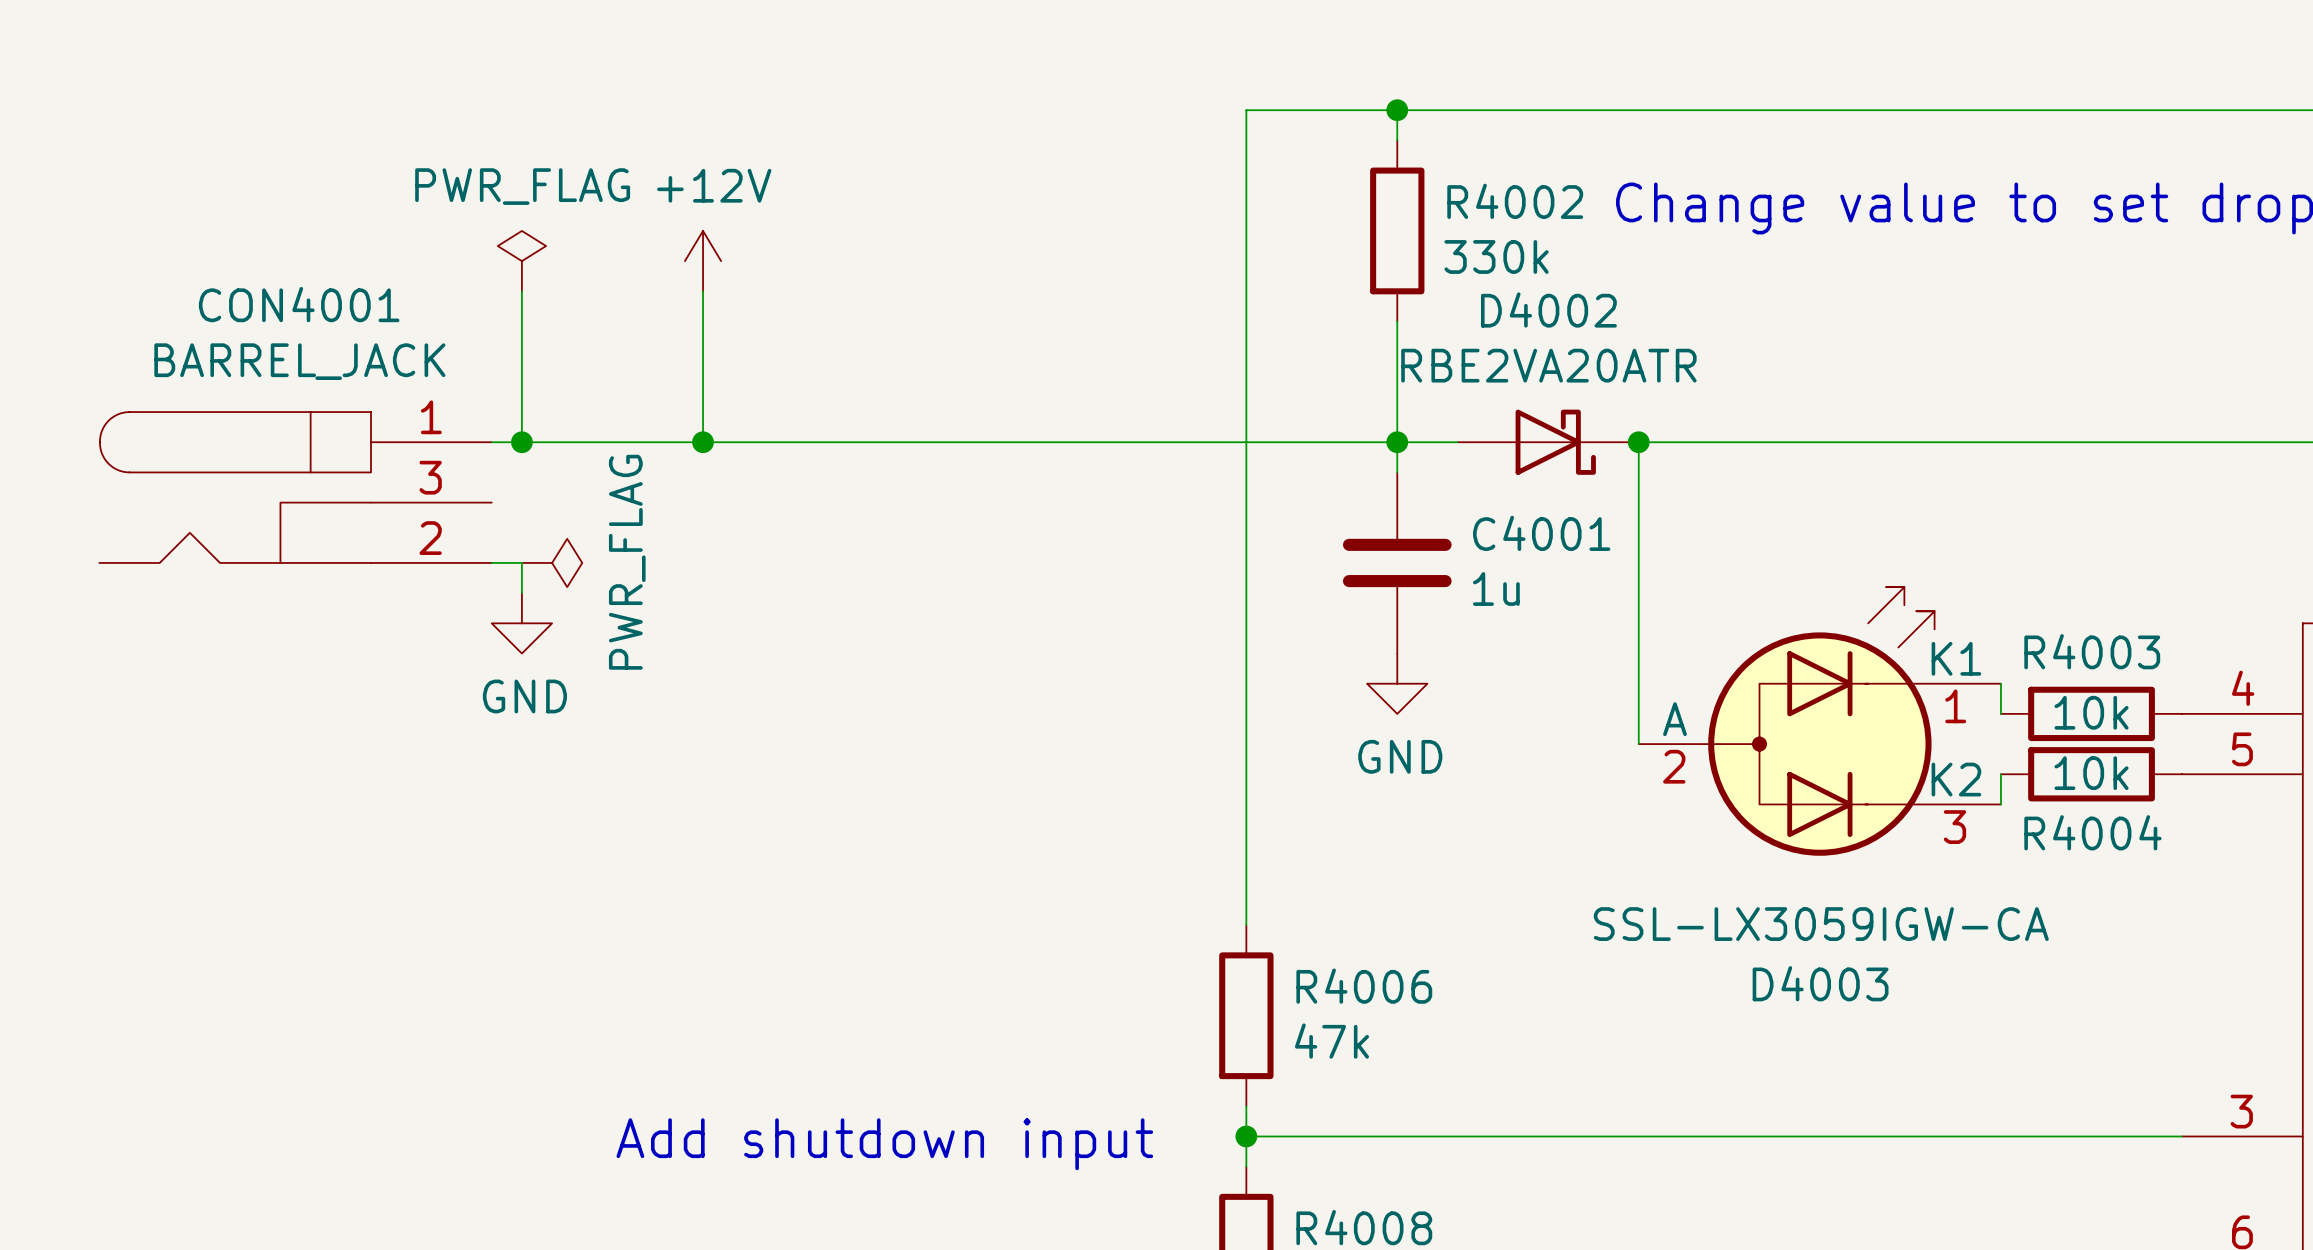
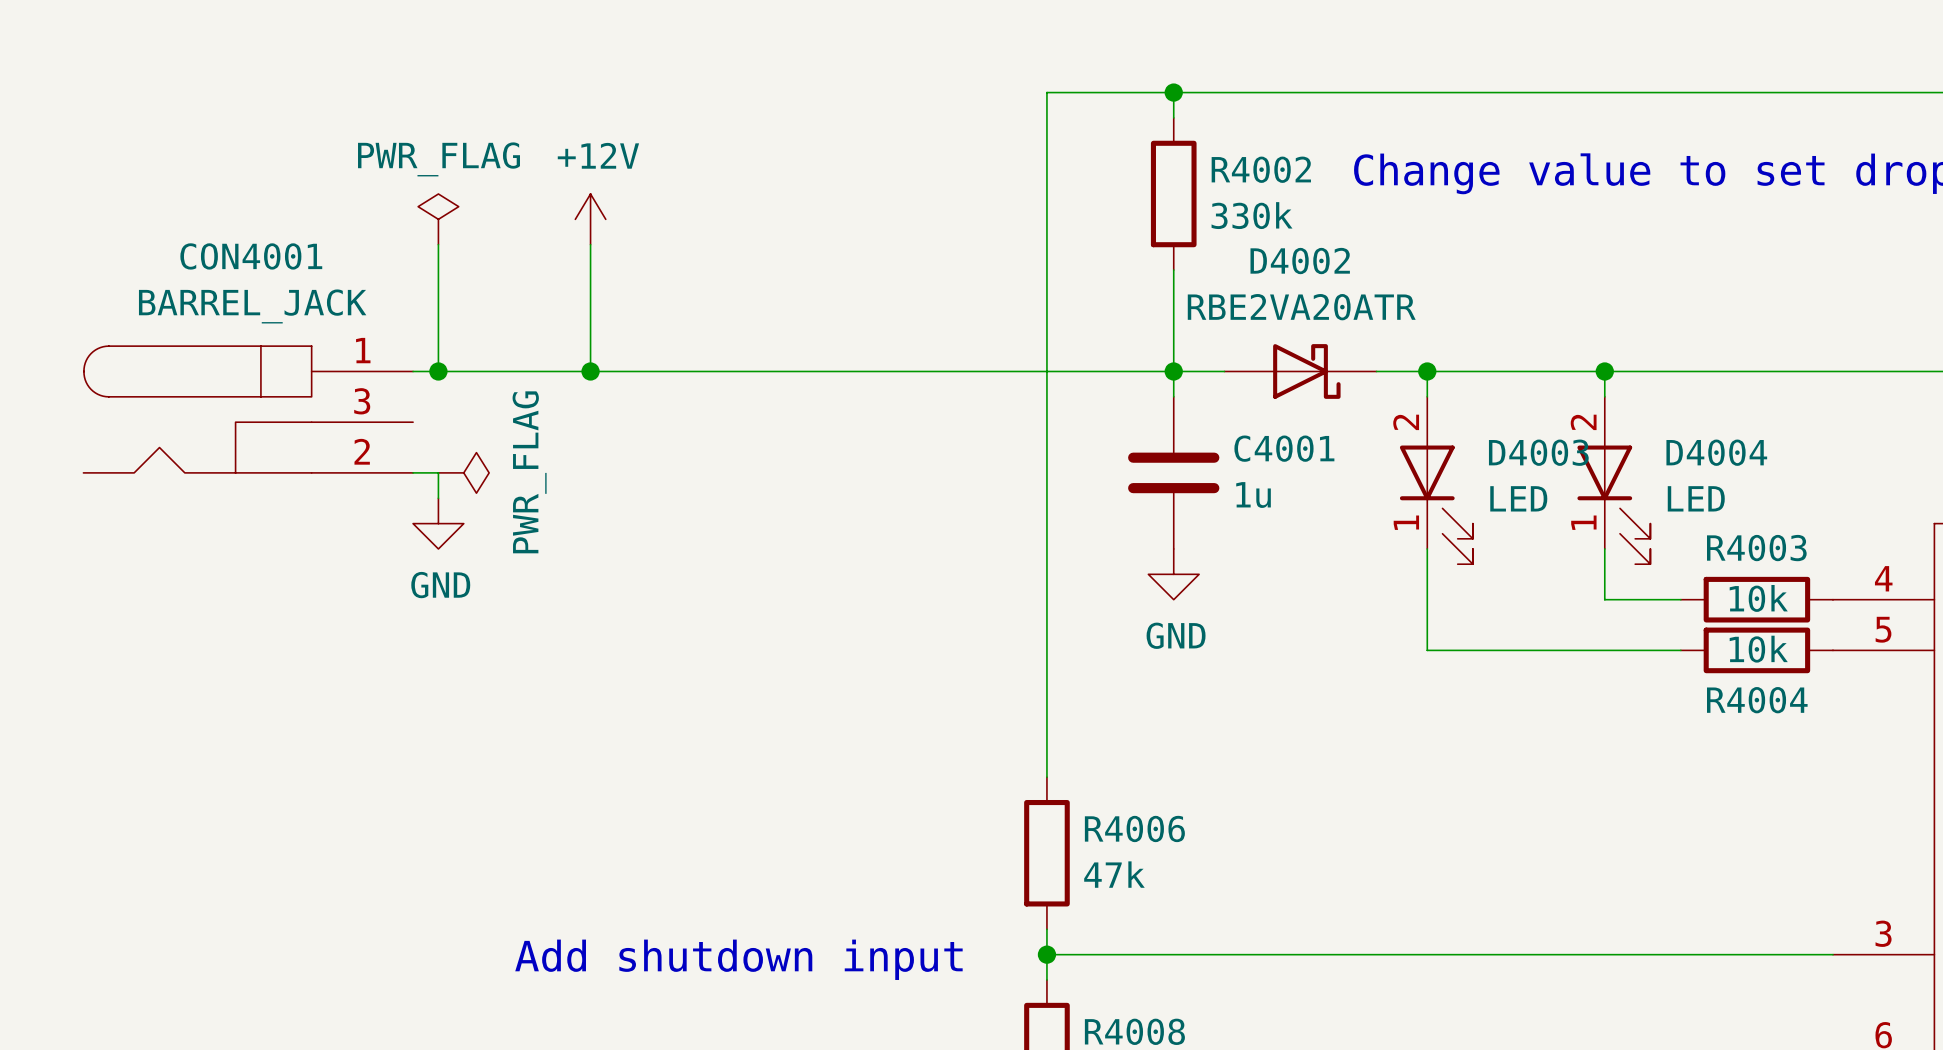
wire: (1638, 442) (1638, 744) -> none
junction position: (1638, 442) -> (1427, 371)
wire: none -> (1427, 371) (1427, 396)
wire: none -> (1604, 371) (1604, 396)
junction: none -> (1604, 371)
D4004: none -> LED (1613, 480)
D4003 symbol: [1638, 587, 2001, 856] -> [1399, 396, 1473, 565]
wire: (2000, 683) (2000, 713) -> (1604, 548) (1604, 599) (1680, 599)
wire: (2000, 774) (2000, 804) -> (1680, 650) (1427, 650) (1427, 548)
D4003 value: SSL-LX3059IGW-CA (1821, 924) -> LED (1518, 498)
D4003 name position: D4003 (1820, 983) -> D4003 (1538, 452)

